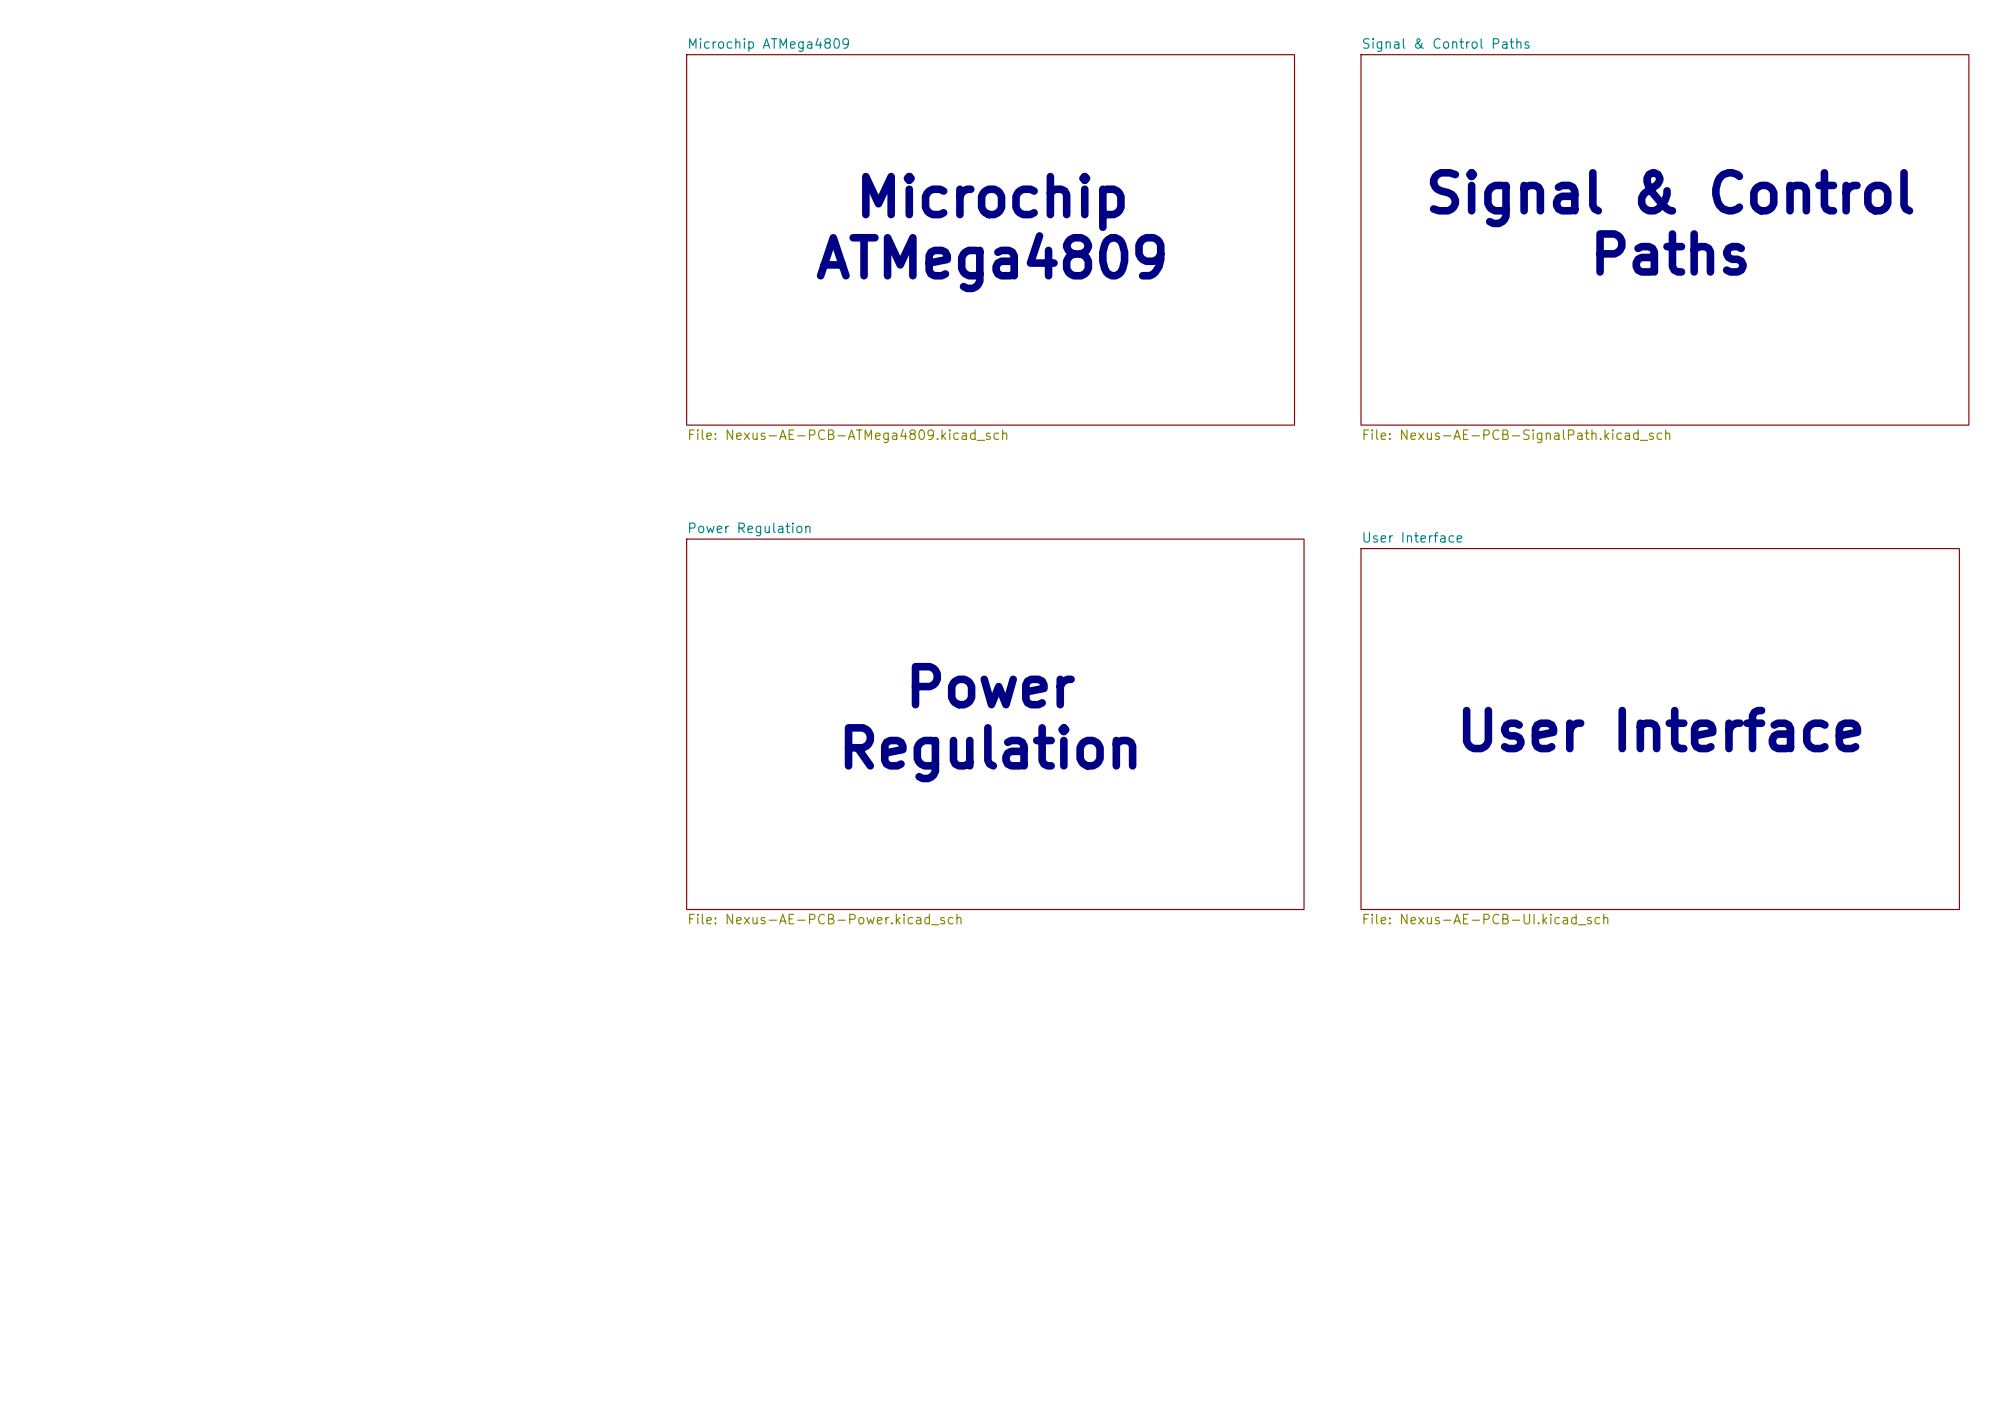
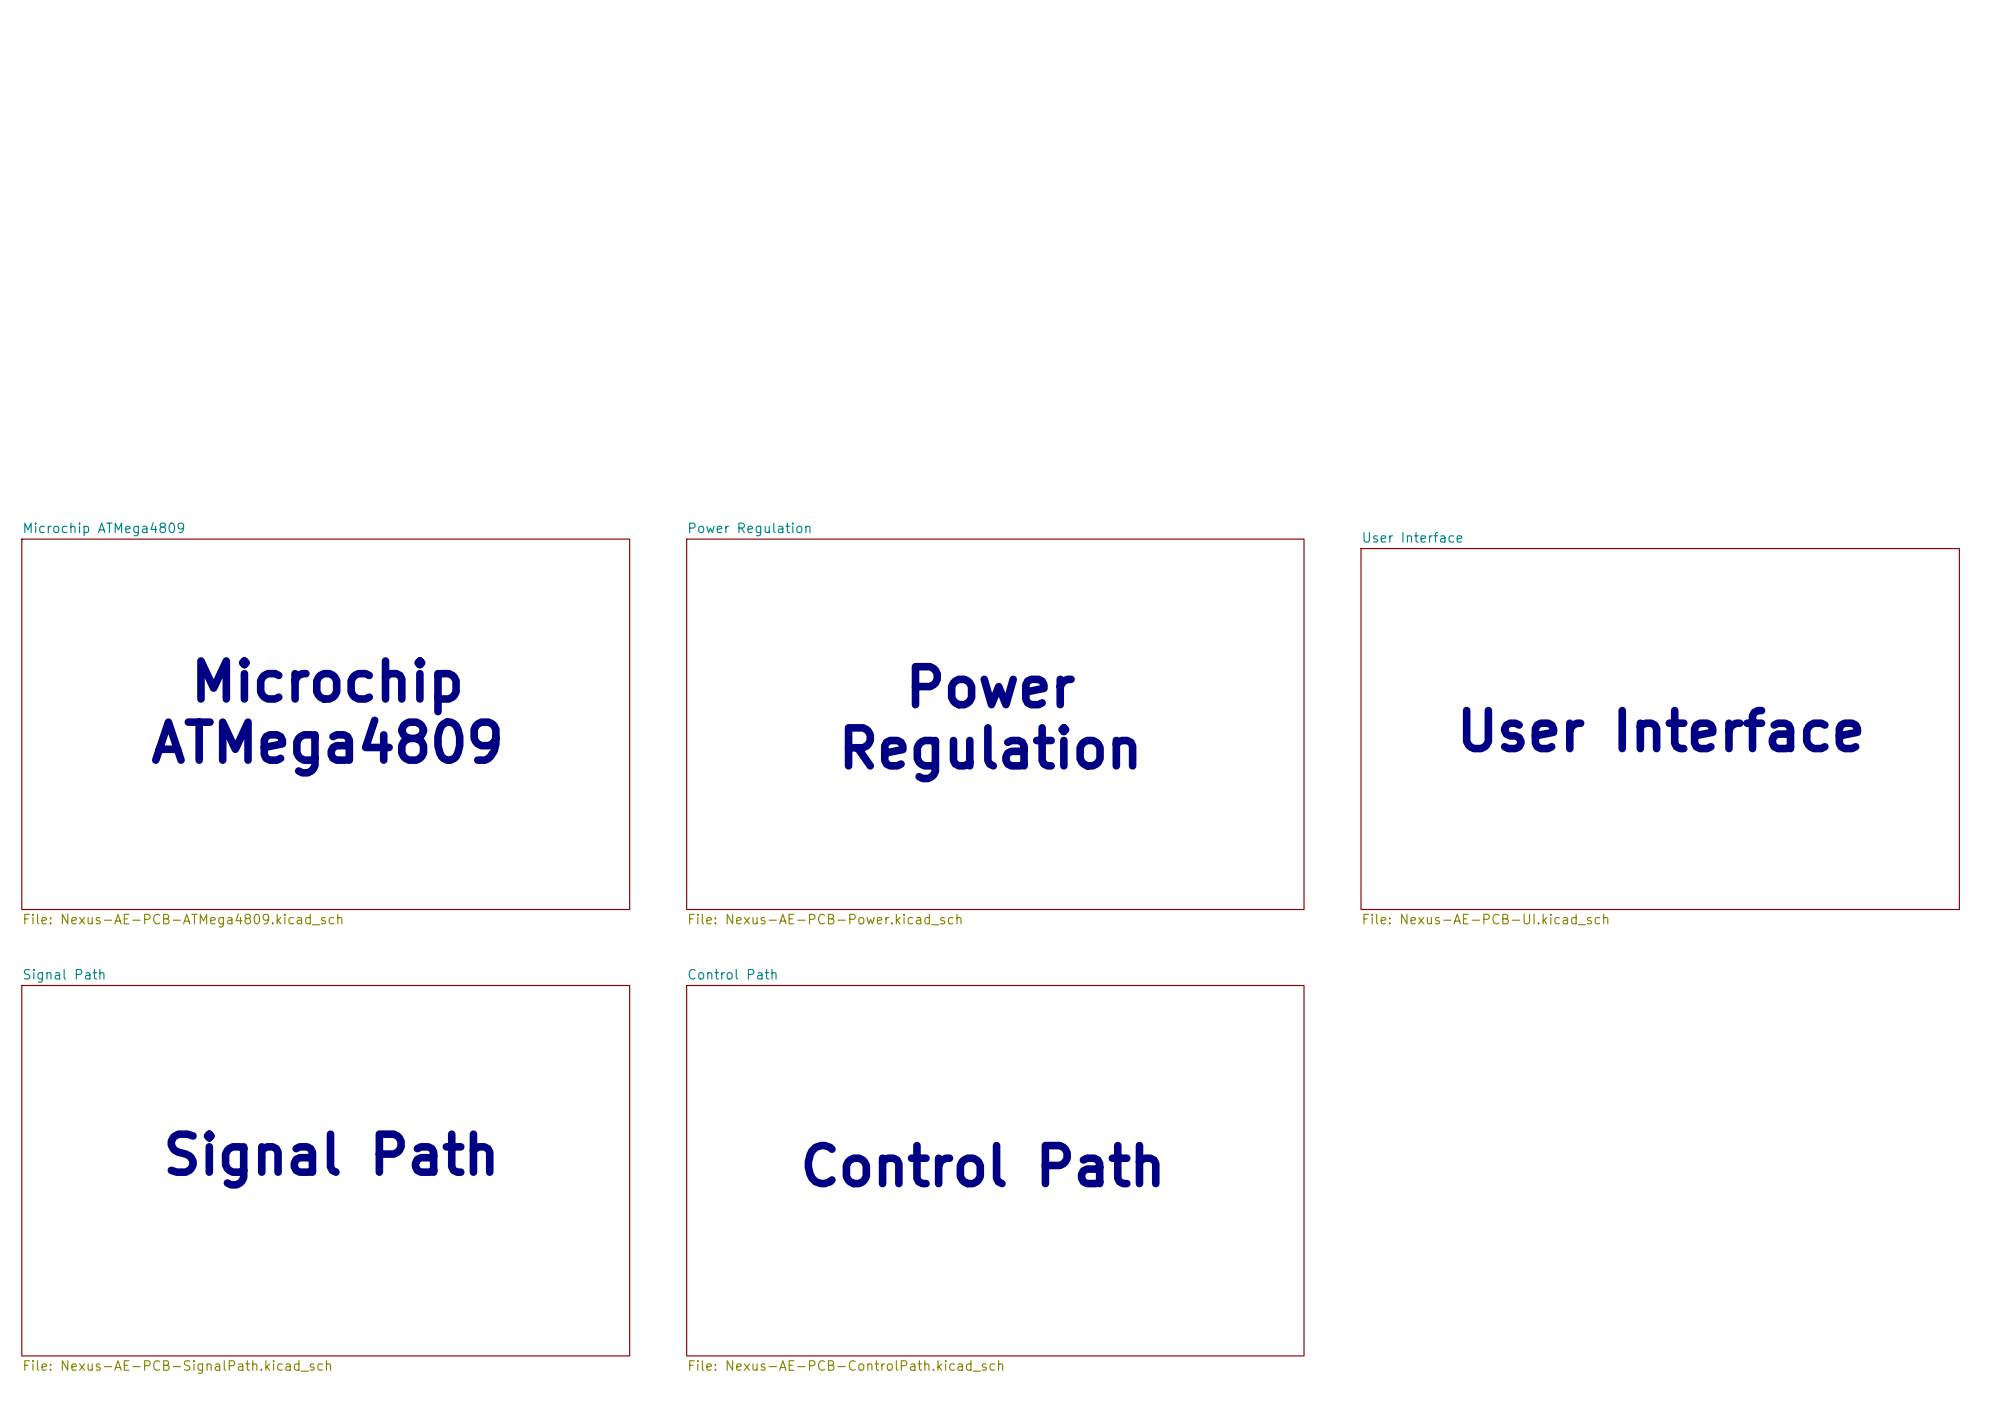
text: Signal & Control (1671, 198) -> none
text: Microchip (993, 201) -> none
sheet Microchip ATMega4809 position: (990, 239) -> (325, 724)
sheet Signal & Control Paths: File: Nexus-AE-PCB-SignalPath.kicad_sch (1664, 239) -> none
text: Paths (1671, 252) -> none
text: ATMega4809 (990, 262) -> none
text: none -> Microchip (328, 686)
text: none -> ATMega4809 (325, 746)
text: none -> Signal Path (330, 1159)
text: none -> Control Path (982, 1164)
sheet Signal Path: none -> File: Nexus-AE-PCB-SignalPath.kicad_sch (325, 1170)
sheet Control Path: none -> File: Nexus-AE-PCB-ControlPath.kicad_sch (995, 1170)

